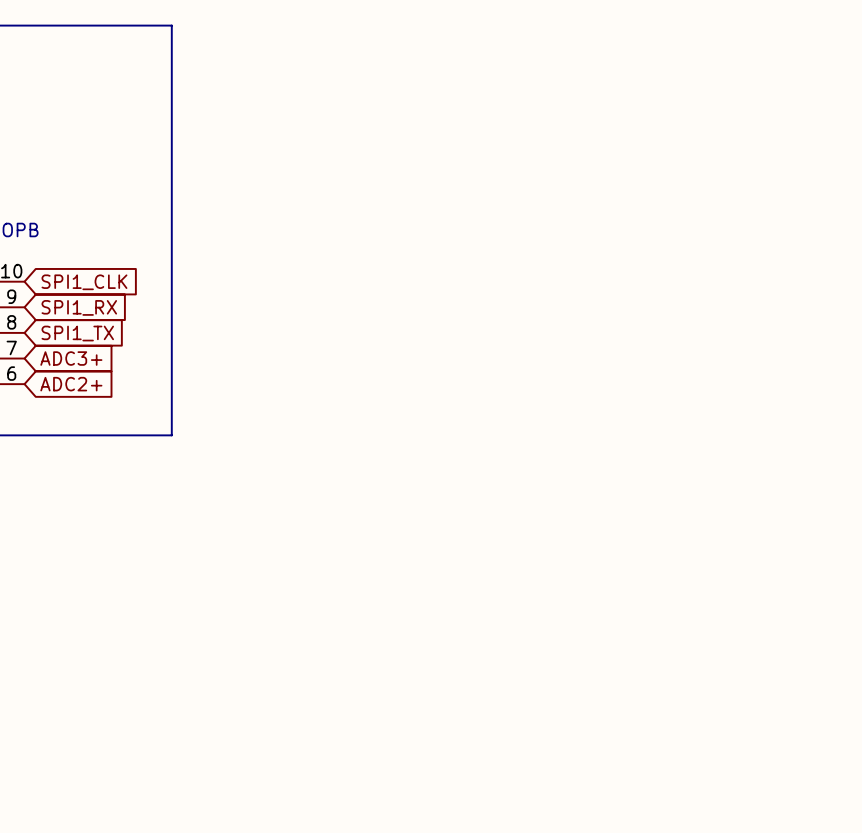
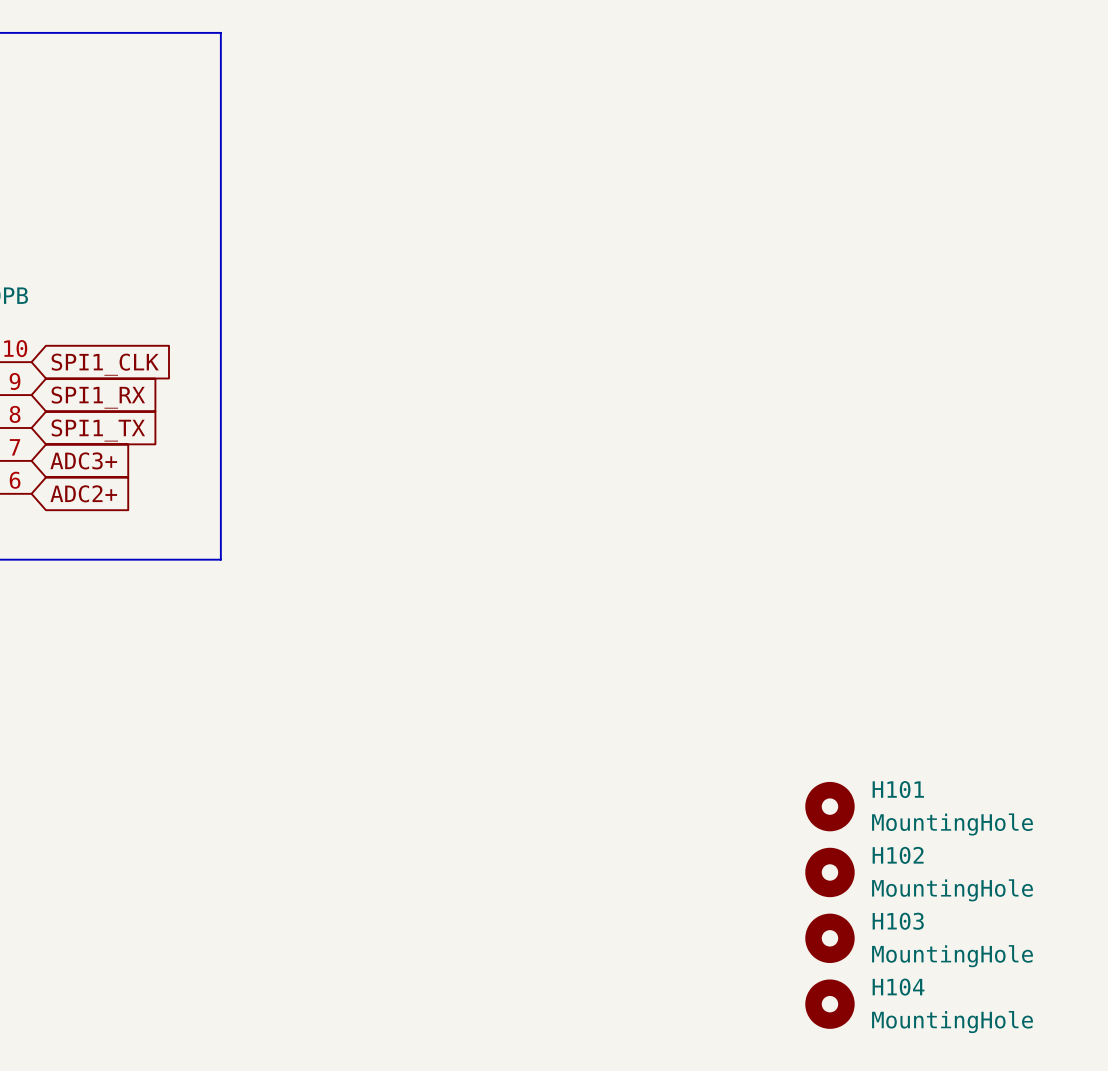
H101: none -> MountingHole (829, 806)
H102: none -> MountingHole (829, 872)
H103: none -> MountingHole (829, 938)
H104: none -> MountingHole (829, 1004)

